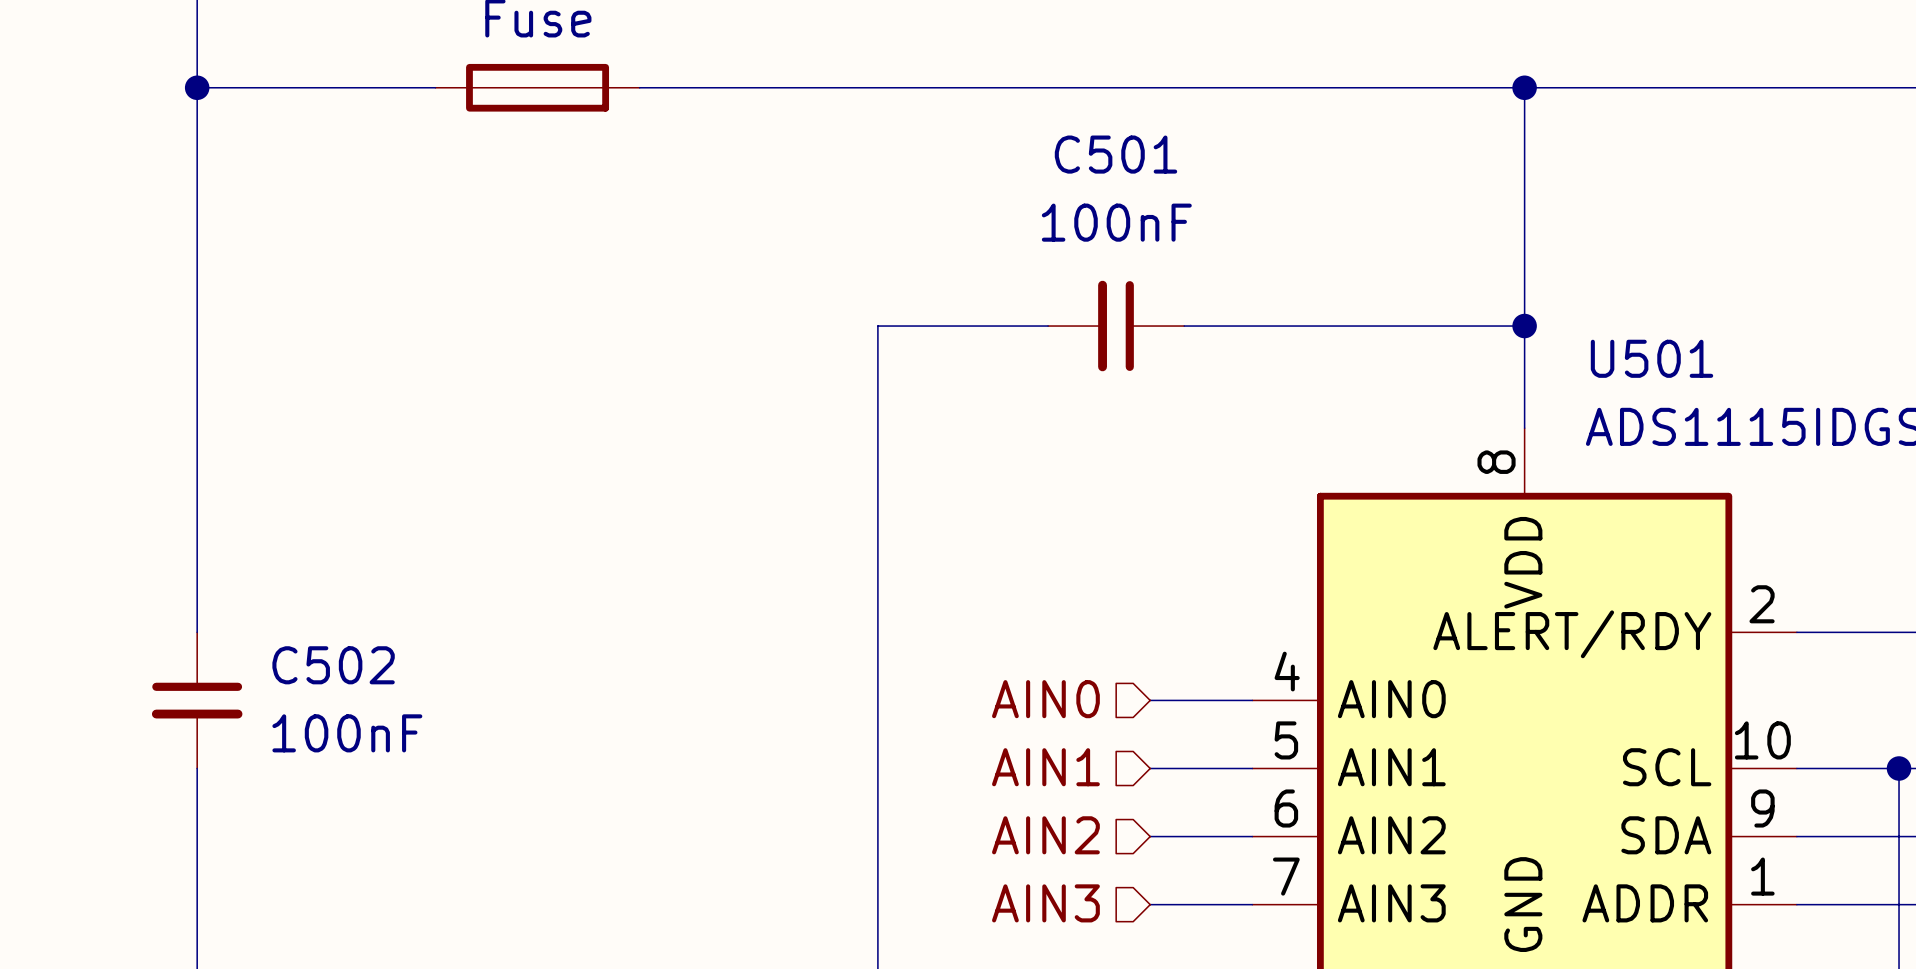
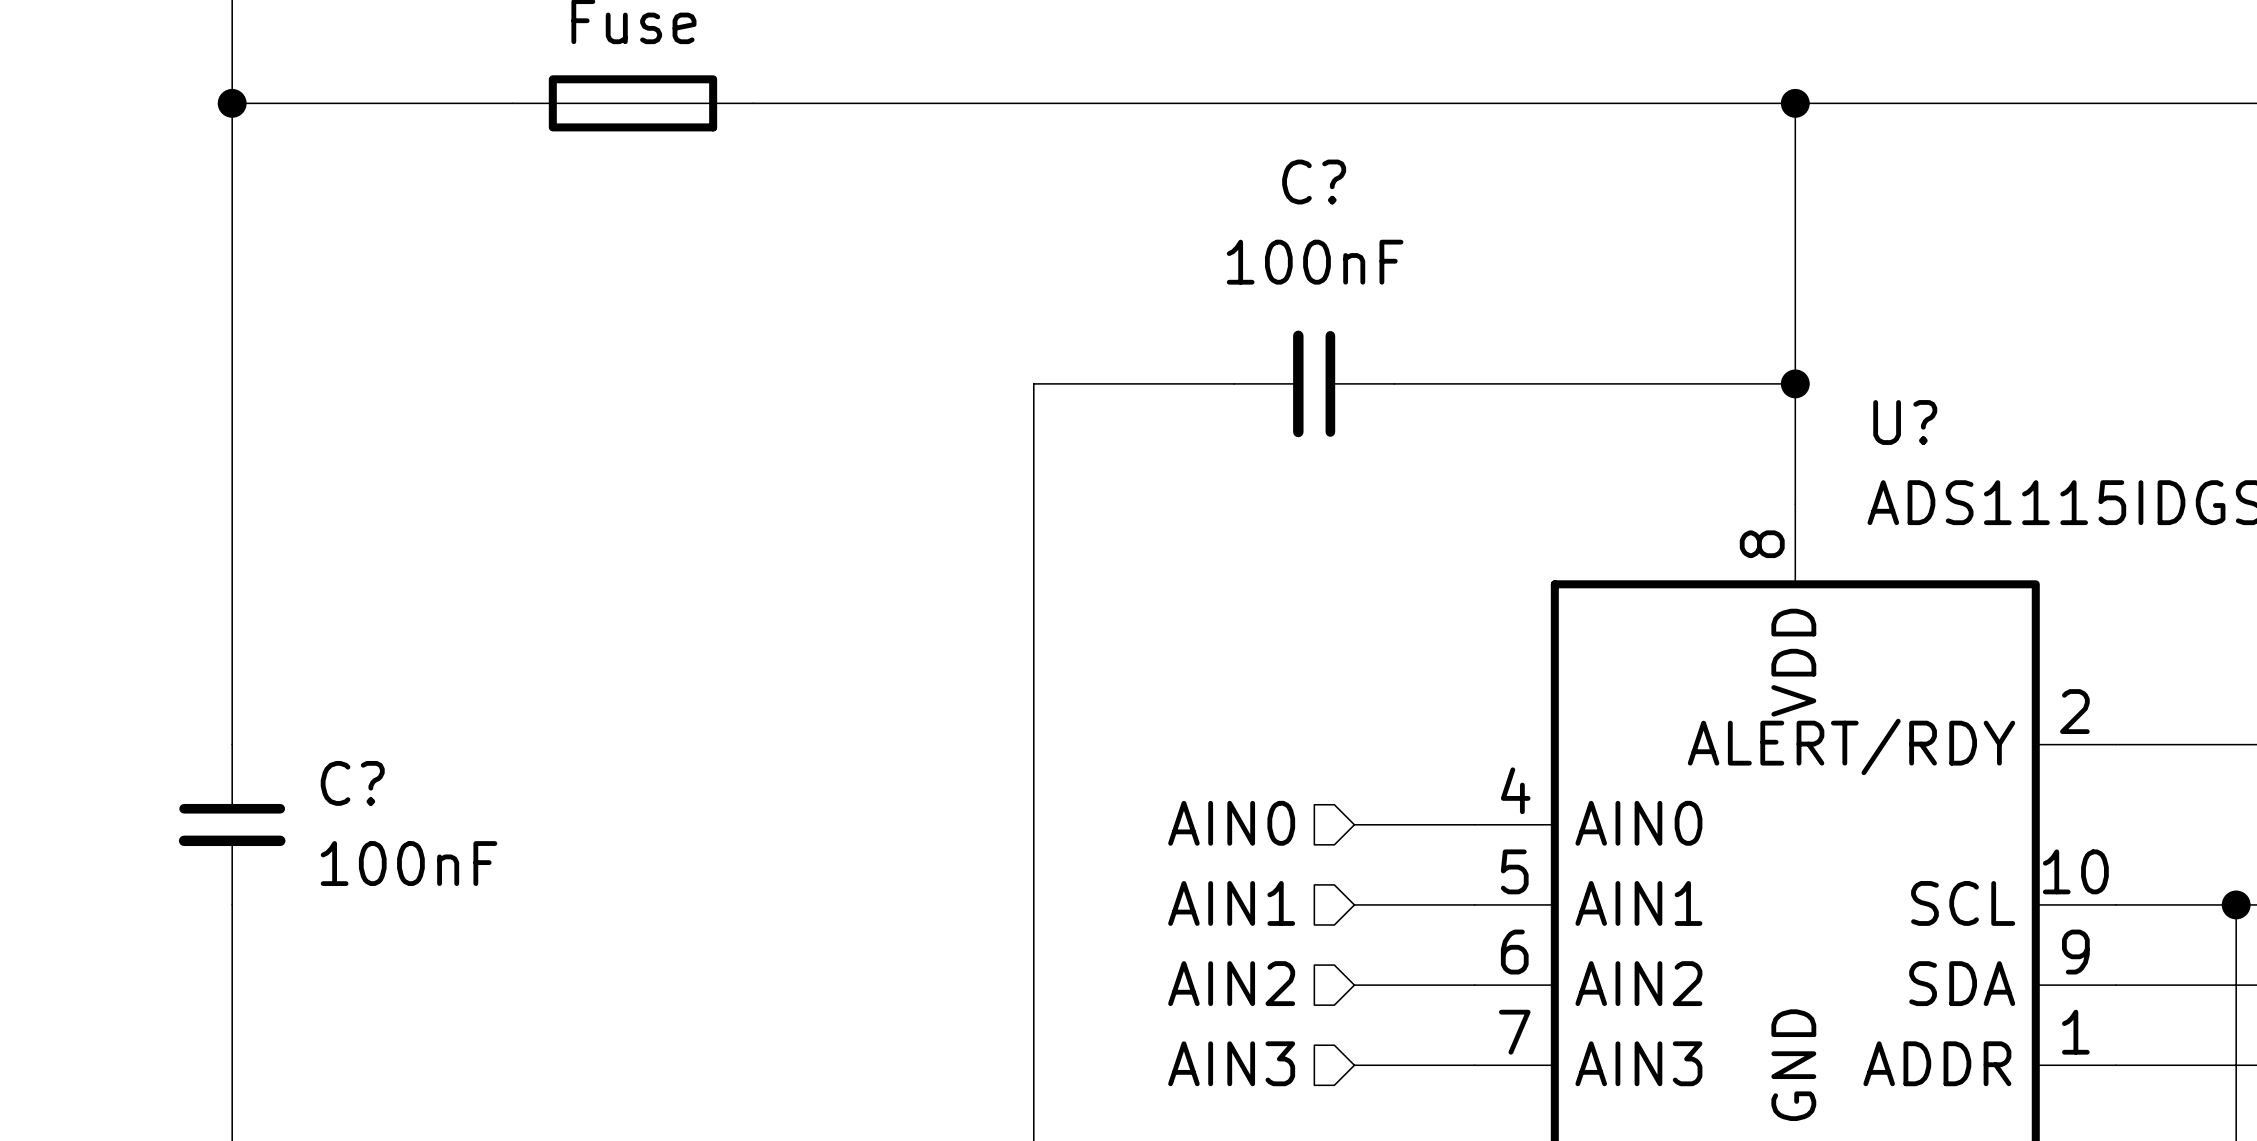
C501 name: C501 (1116, 154) -> C? (1314, 182)
U501 name: U501 (1652, 358) -> U? (1905, 422)
C502 name: C502 (333, 665) -> C? (352, 783)

